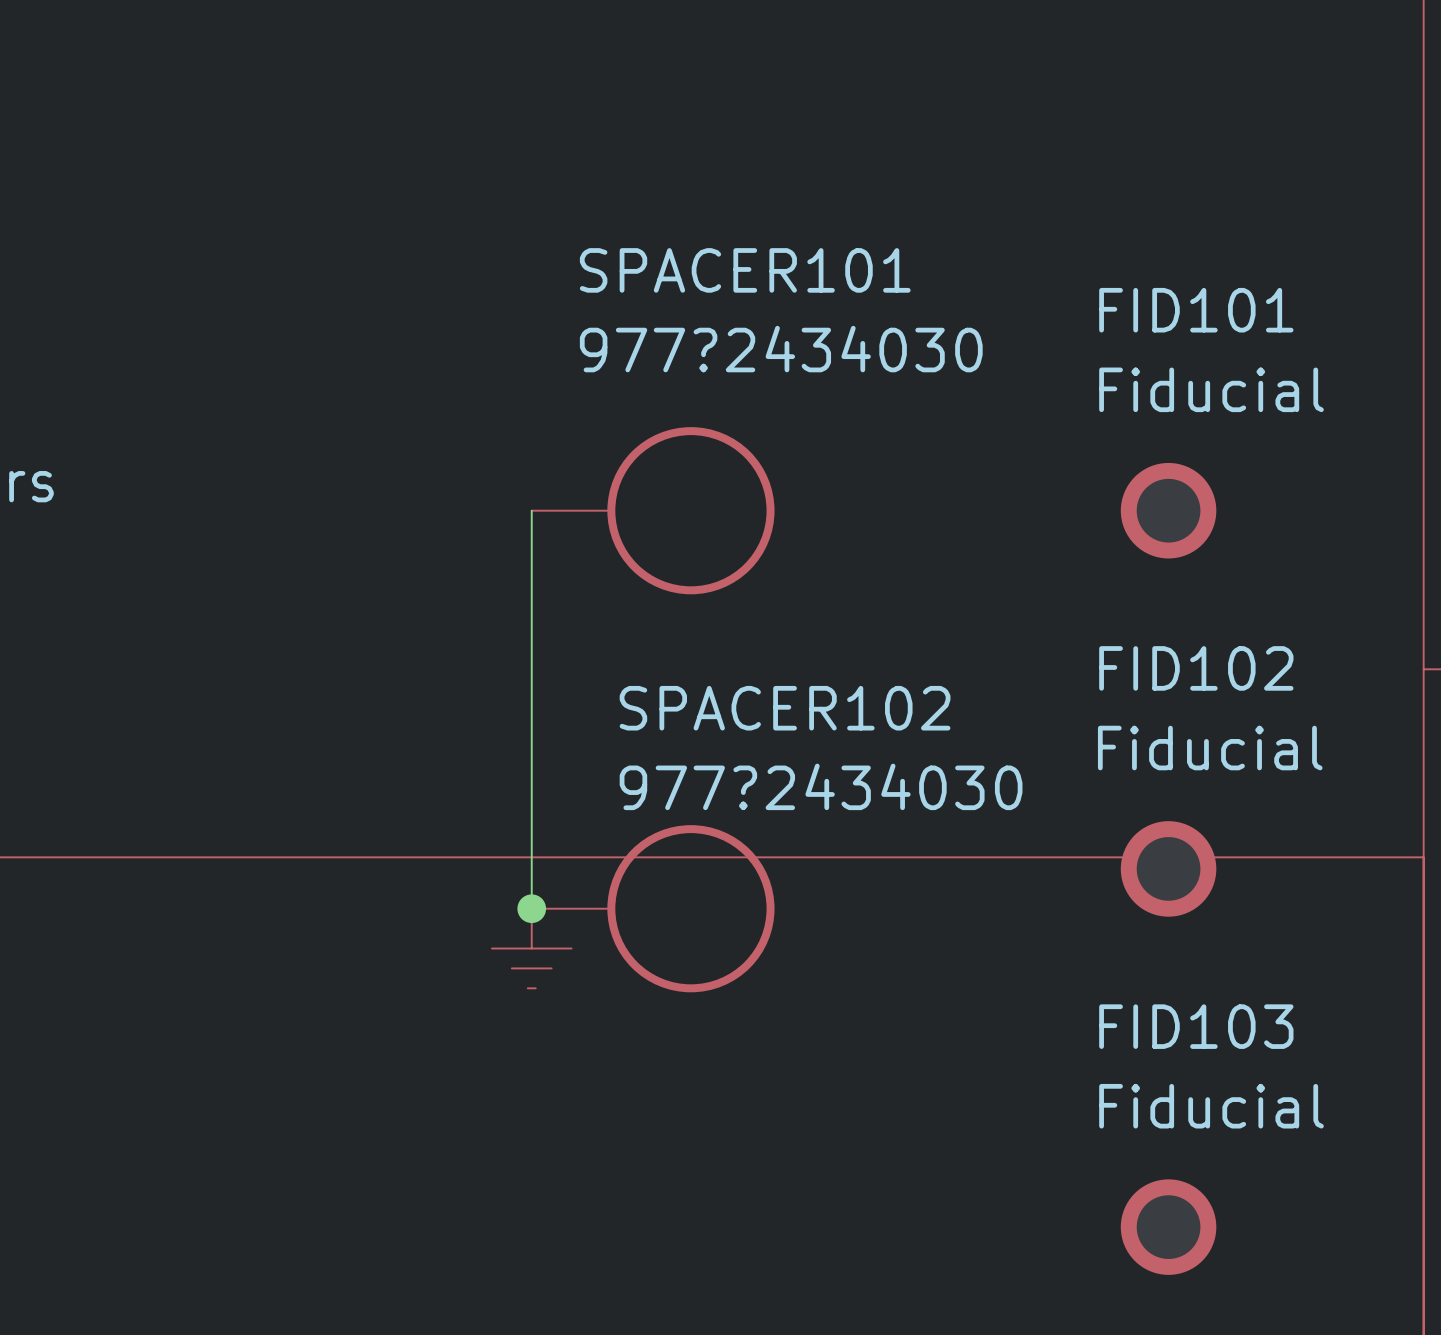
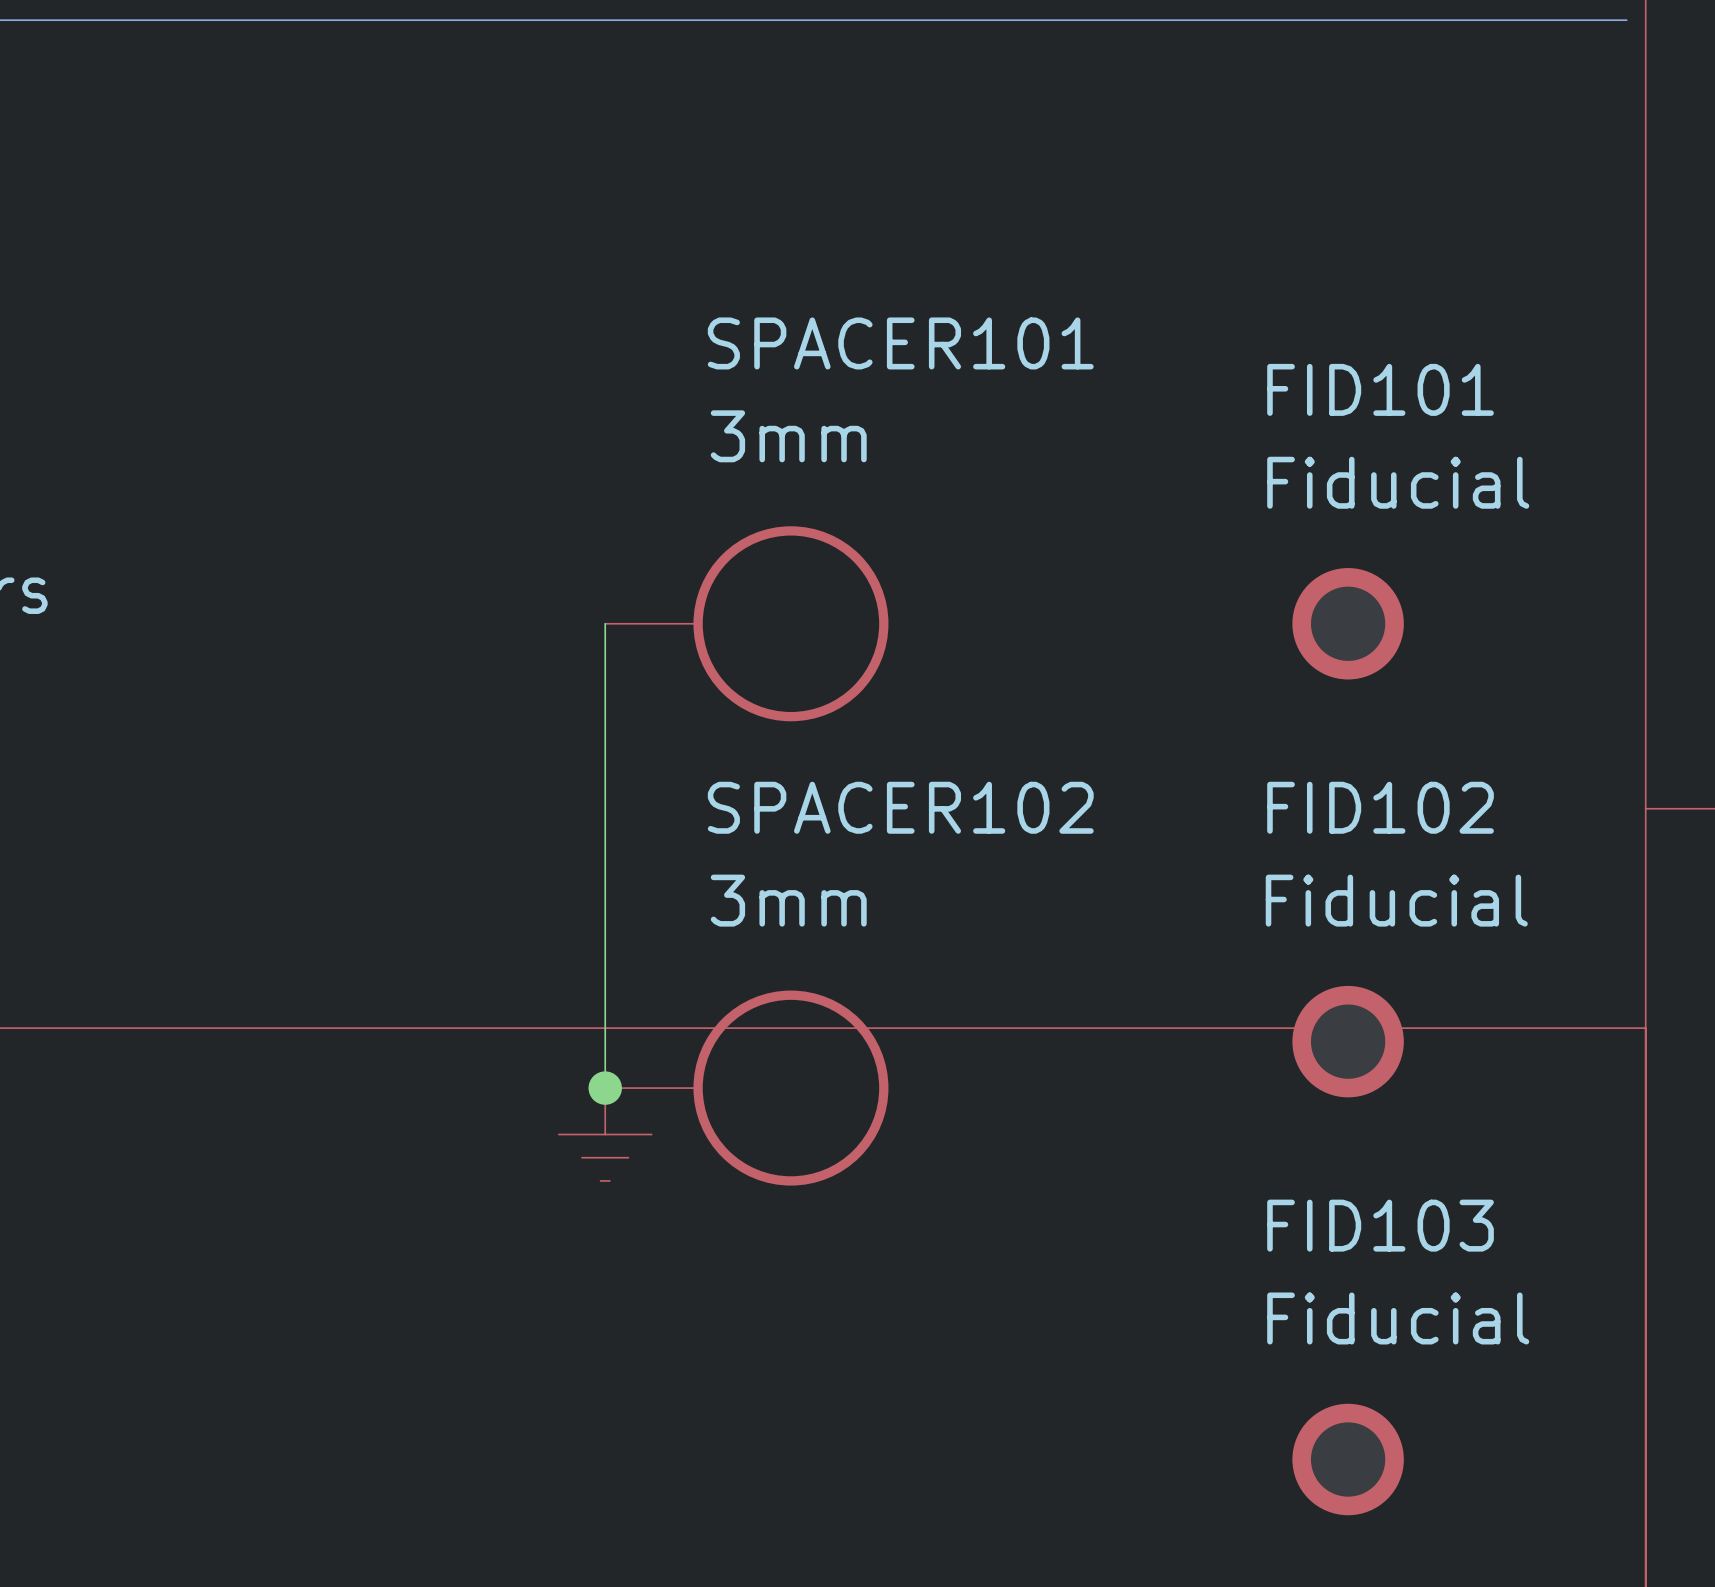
SPACER101 name position: SPACER101 (745, 270) -> SPACER101 (900, 343)
SPACER101 value: 977?2434030 (781, 349) -> 3mm (788, 436)
SPACER102 name position: SPACER102 (785, 708) -> SPACER102 (900, 807)
SPACER102 value: 977?2434030 (821, 786) -> 3mm (788, 900)

